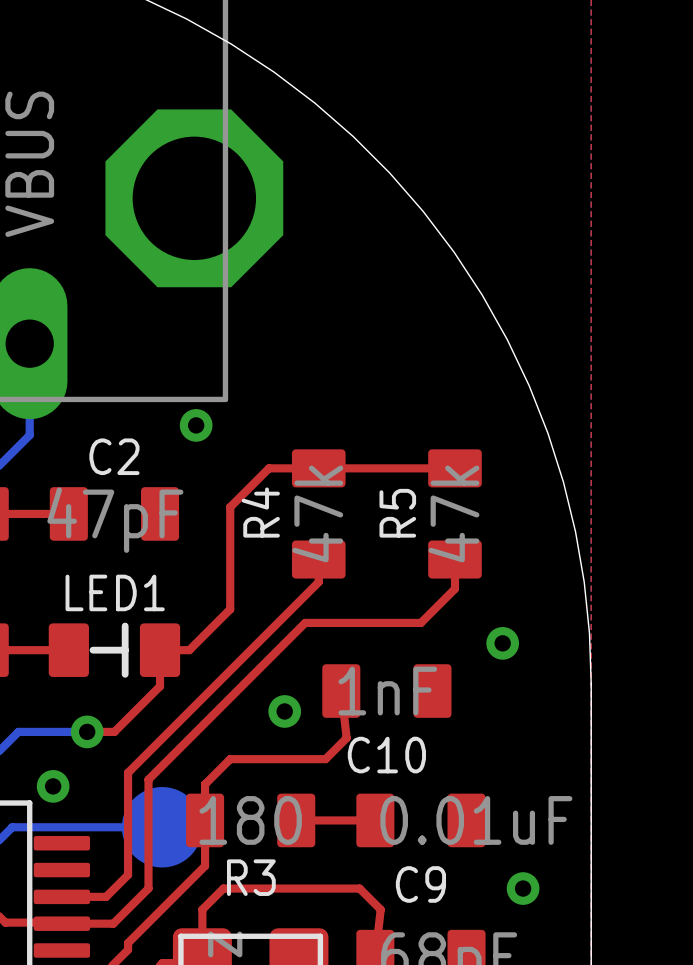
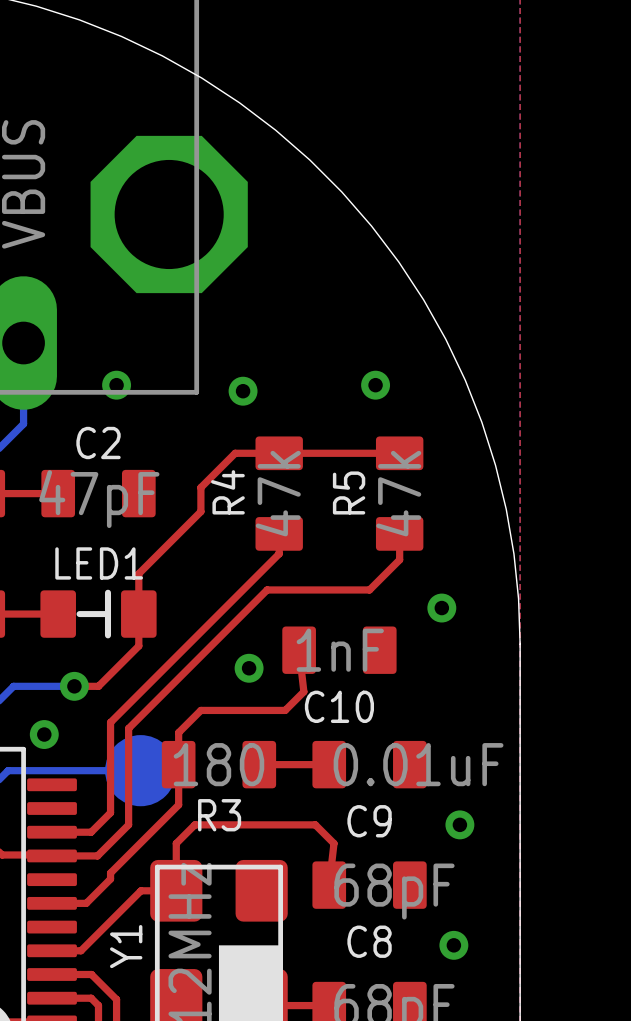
via: none -> (116, 385)
via: none -> (375, 385)
via: none -> (243, 391)
via: (196, 425) -> none
top track: (230, 534) (230, 609) (189, 650) (160, 650) -> (200, 511) (138, 573) (138, 614)

